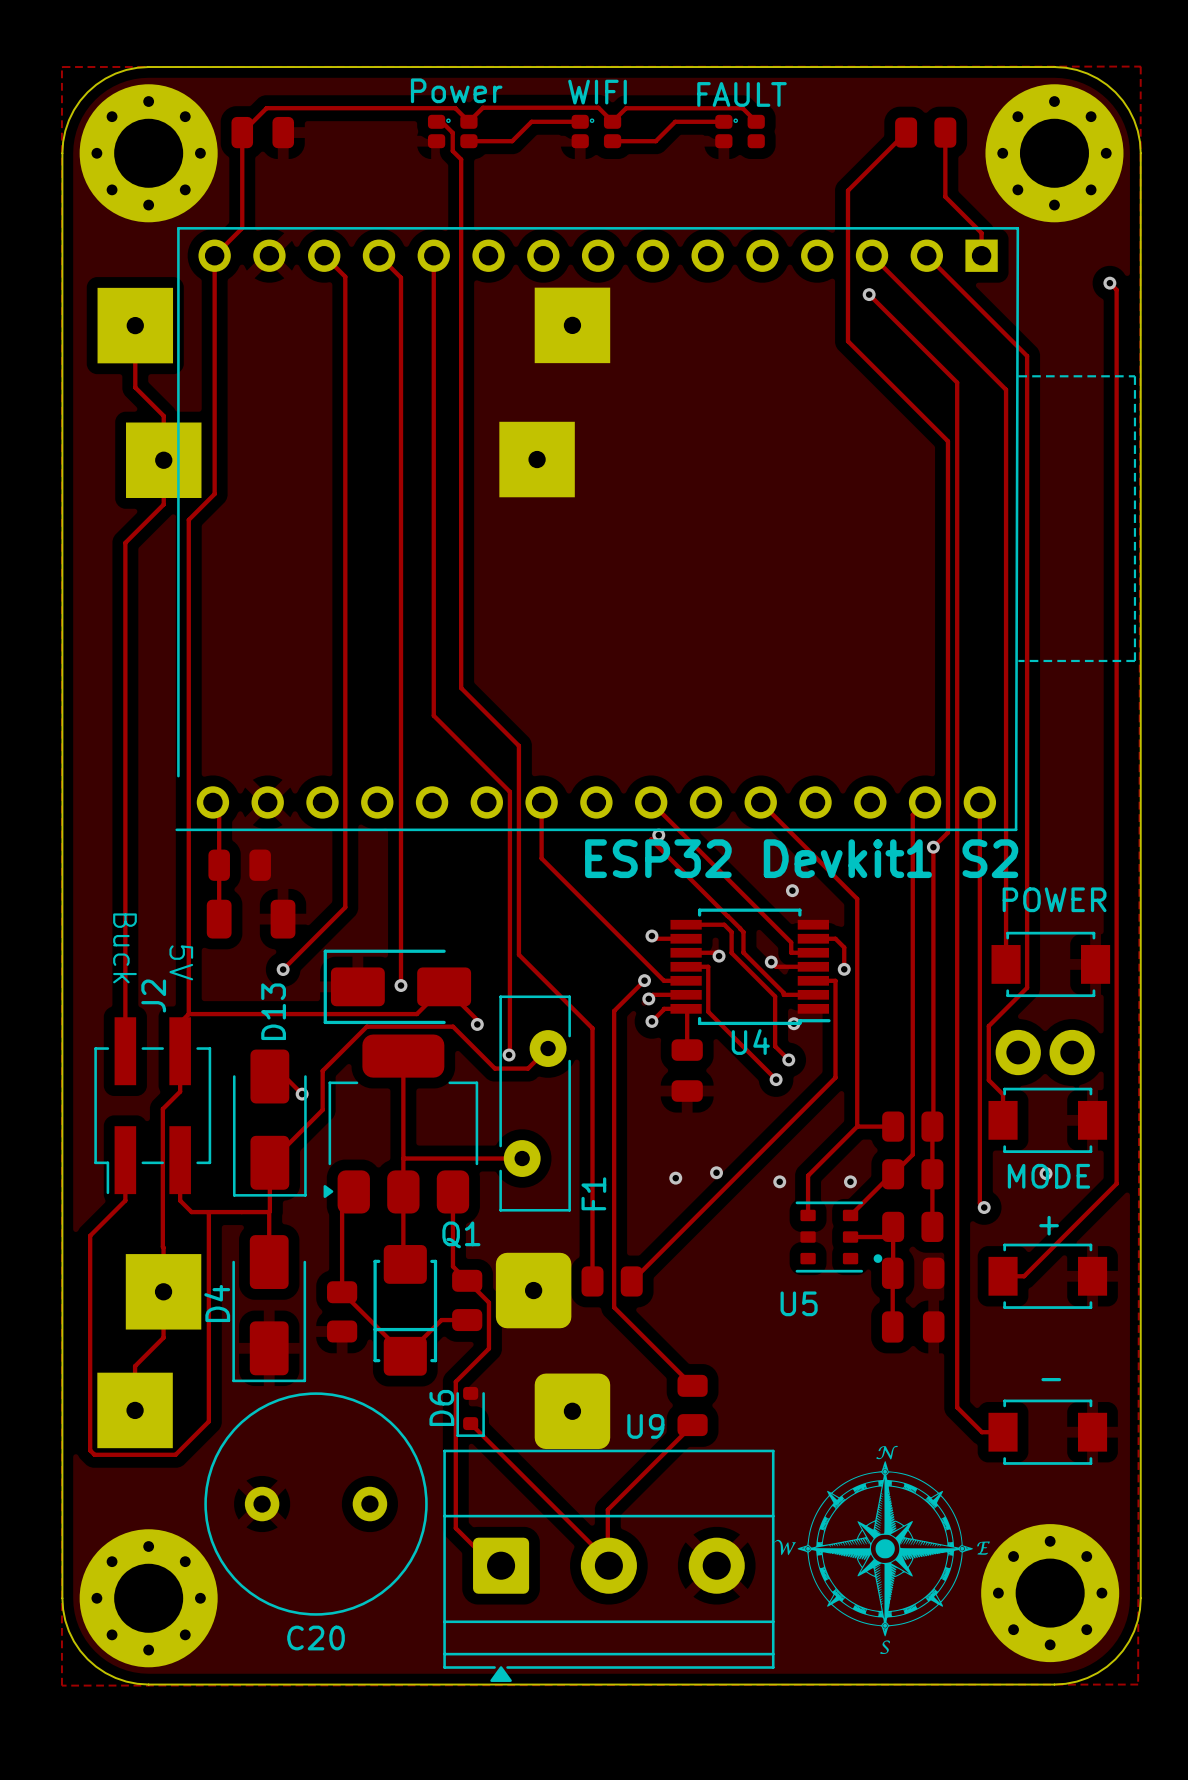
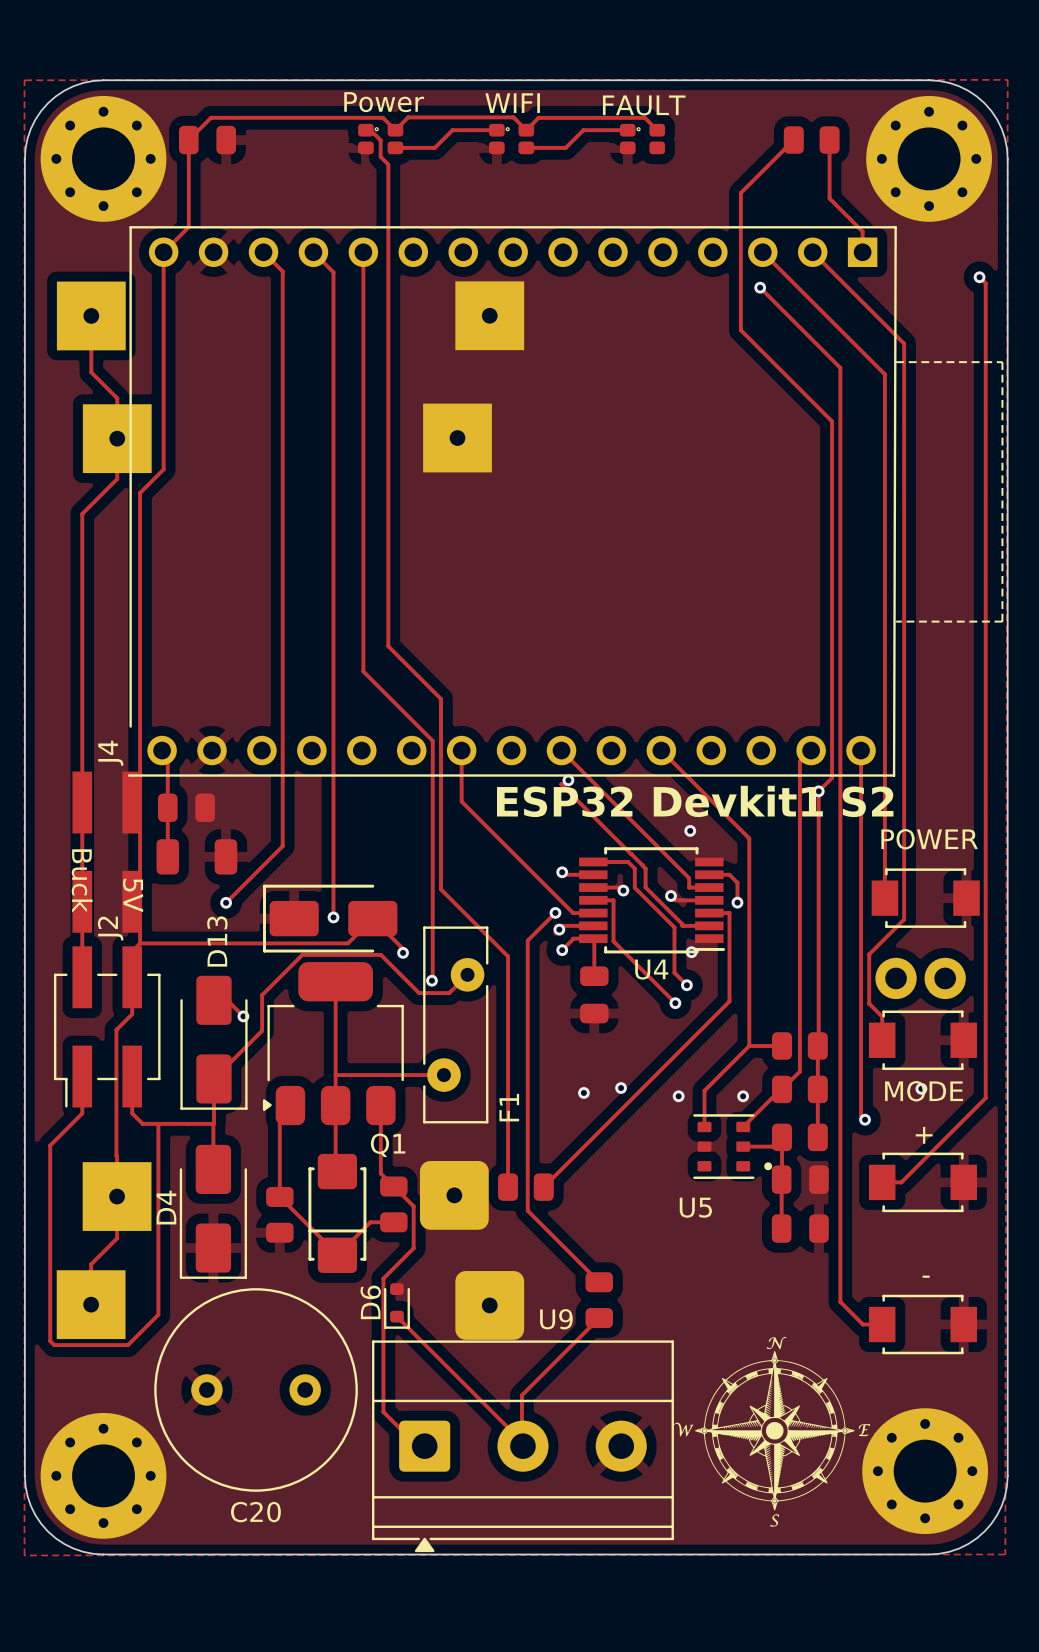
J4: none -> (107, 852)

